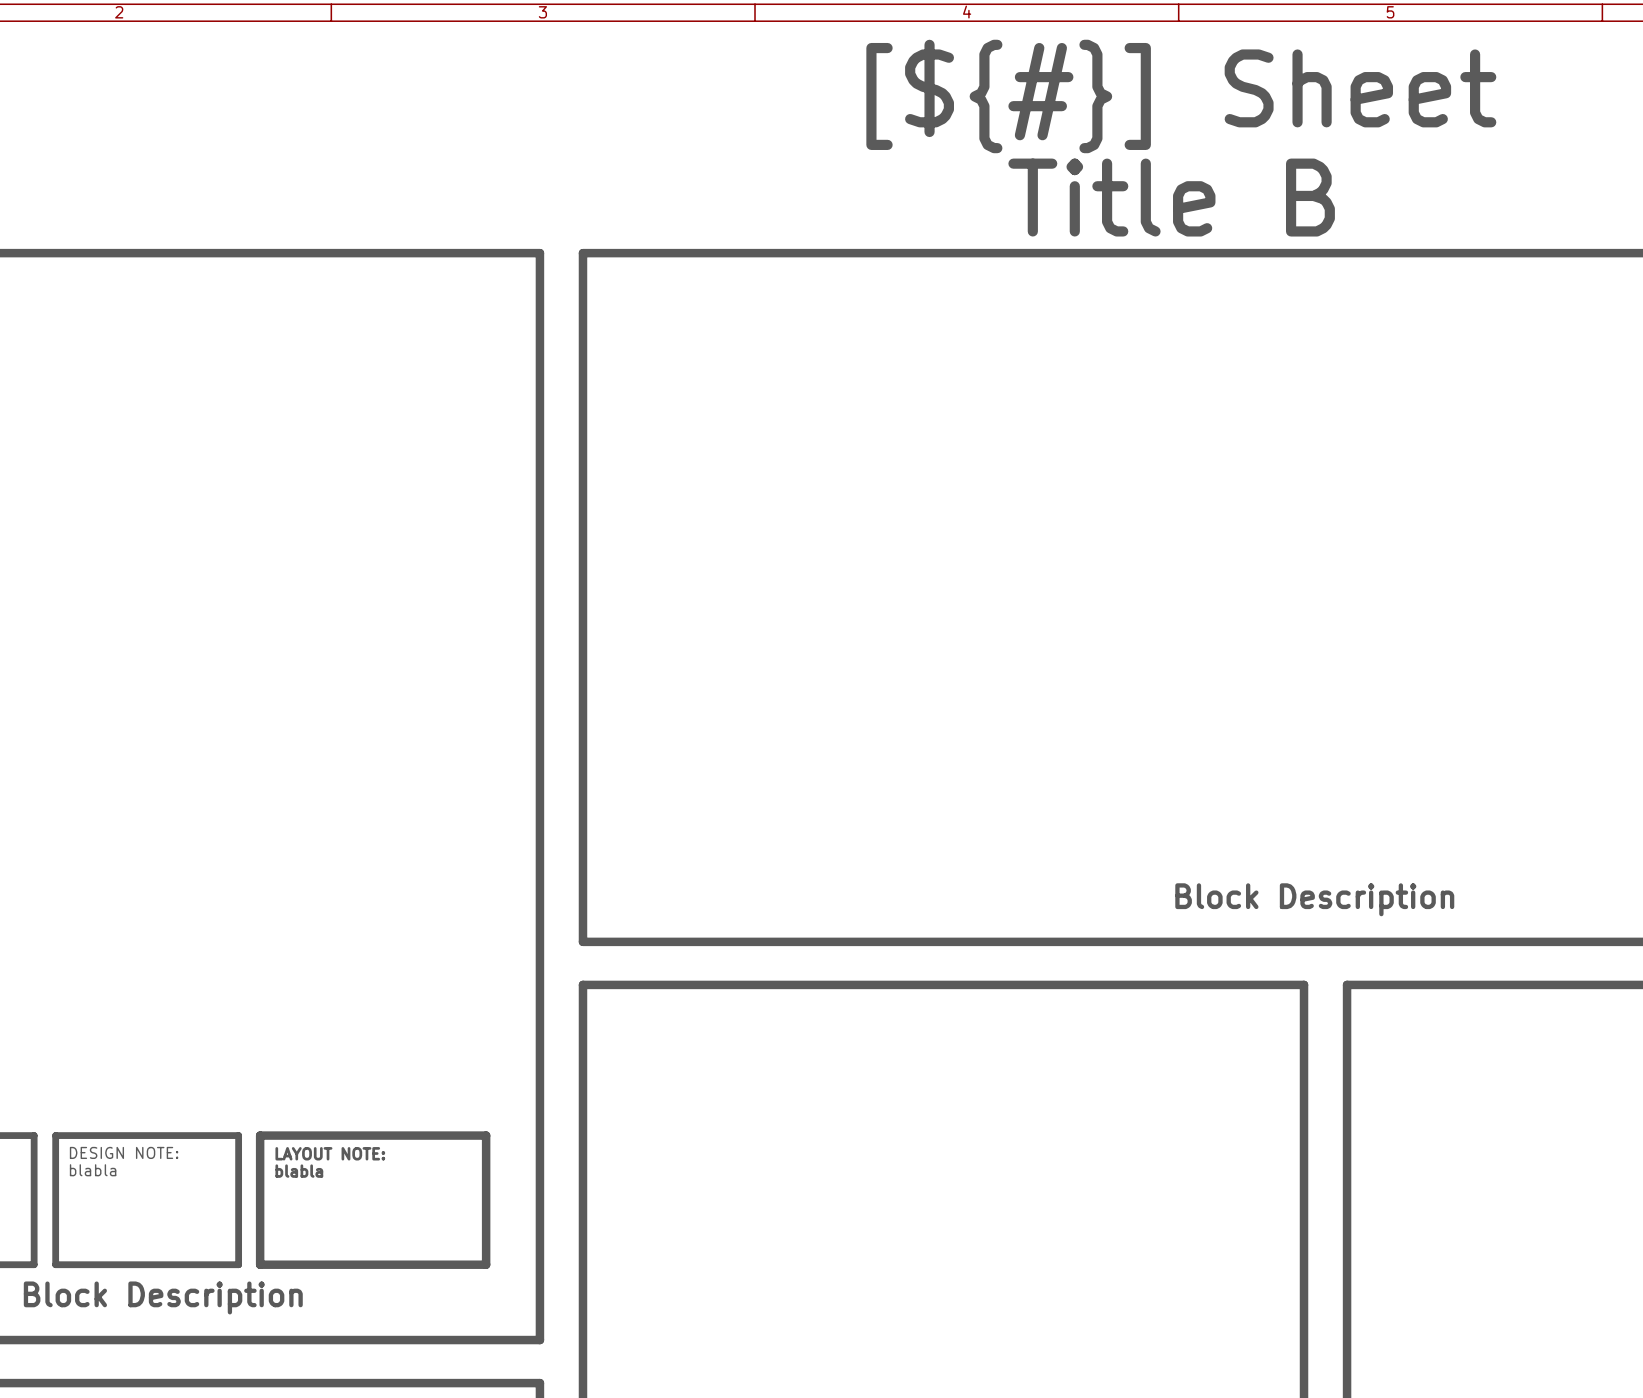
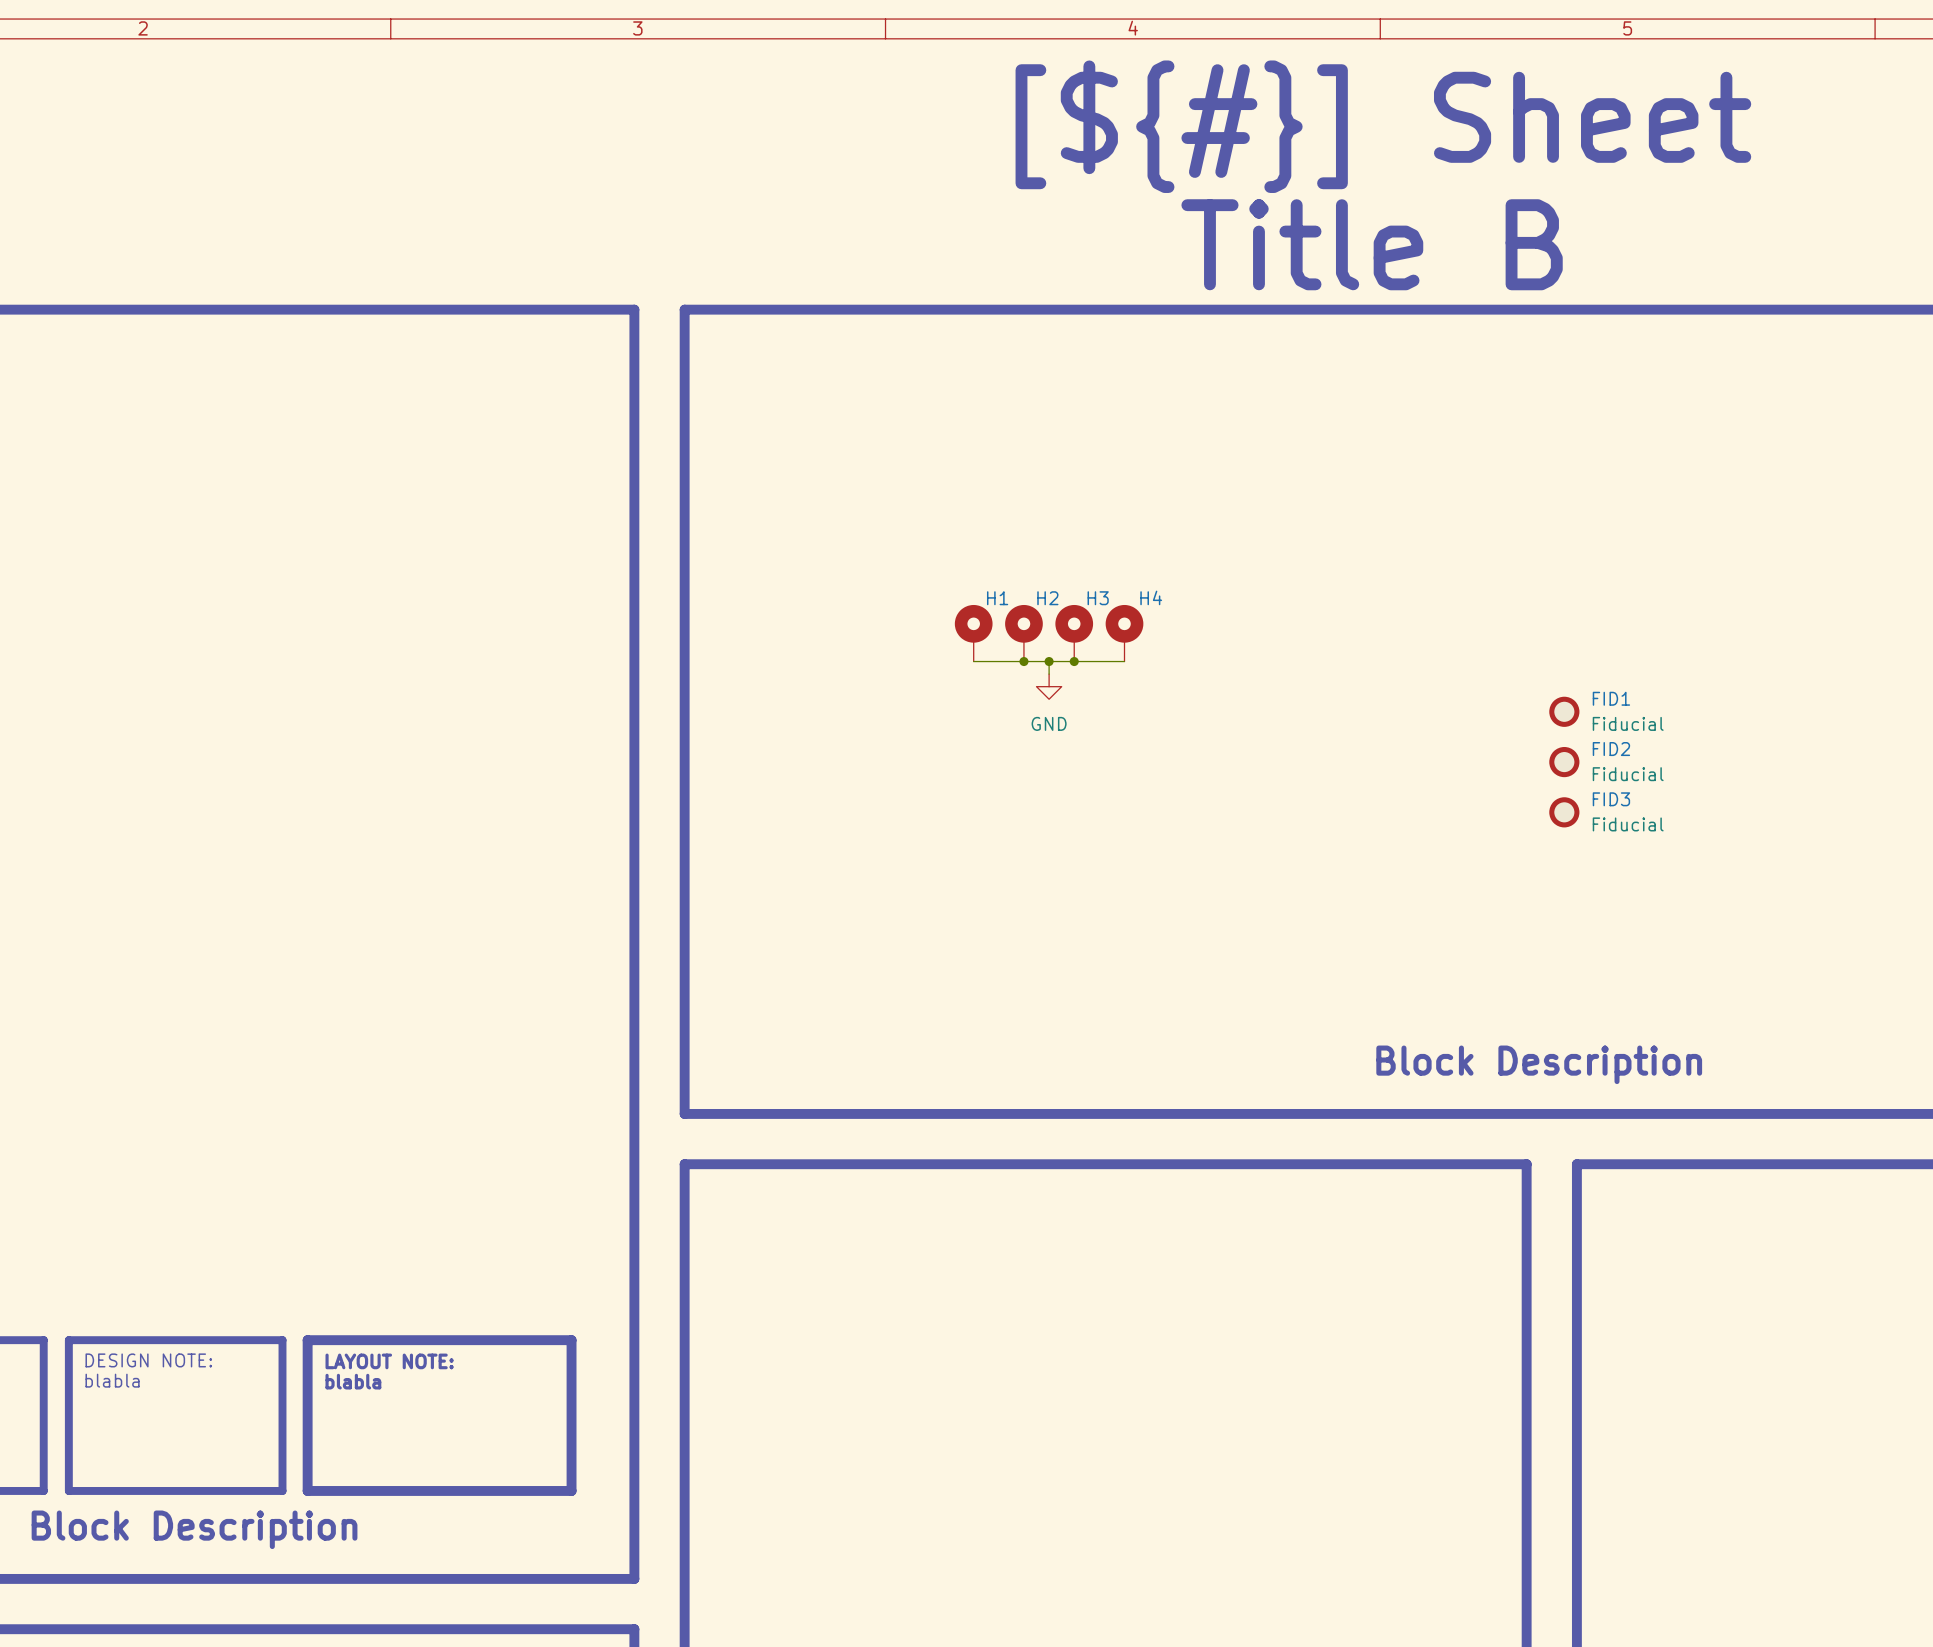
H1: none -> (973, 633)
H2: none -> (1023, 633)
H3: none -> (1074, 633)
H4: none -> (1124, 633)
wire: none -> (973, 661) (1124, 661)
junction: none -> (1023, 661)
wire: none -> (1049, 661) (1049, 674)
junction: none -> (1049, 661)
junction: none -> (1074, 661)
power symbol: none -> GND (1049, 686)
FID1: none -> Fiducial (1564, 711)
FID2: none -> Fiducial (1564, 762)
FID3: none -> Fiducial (1564, 812)

